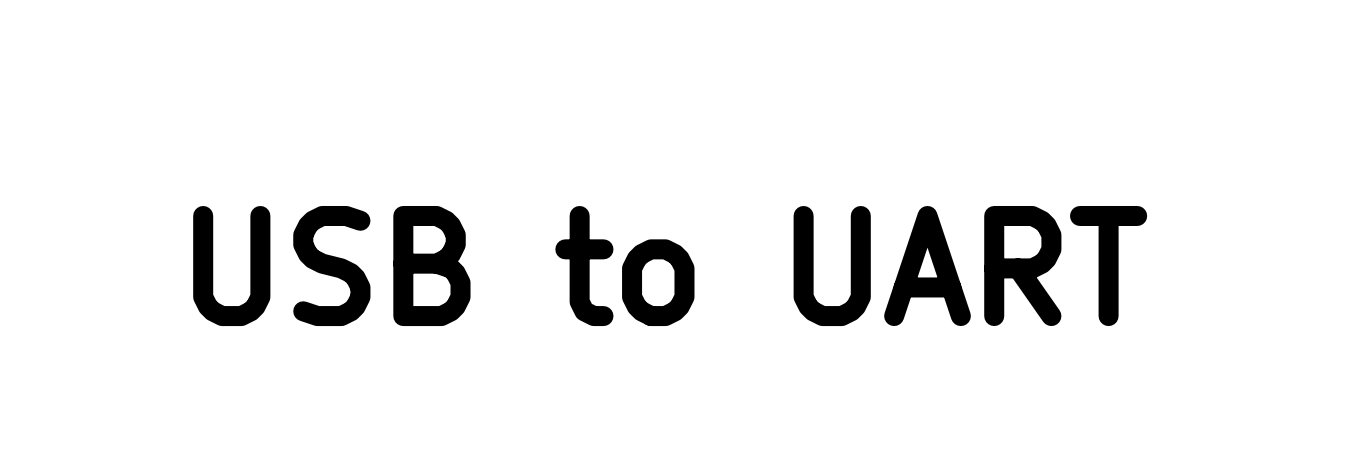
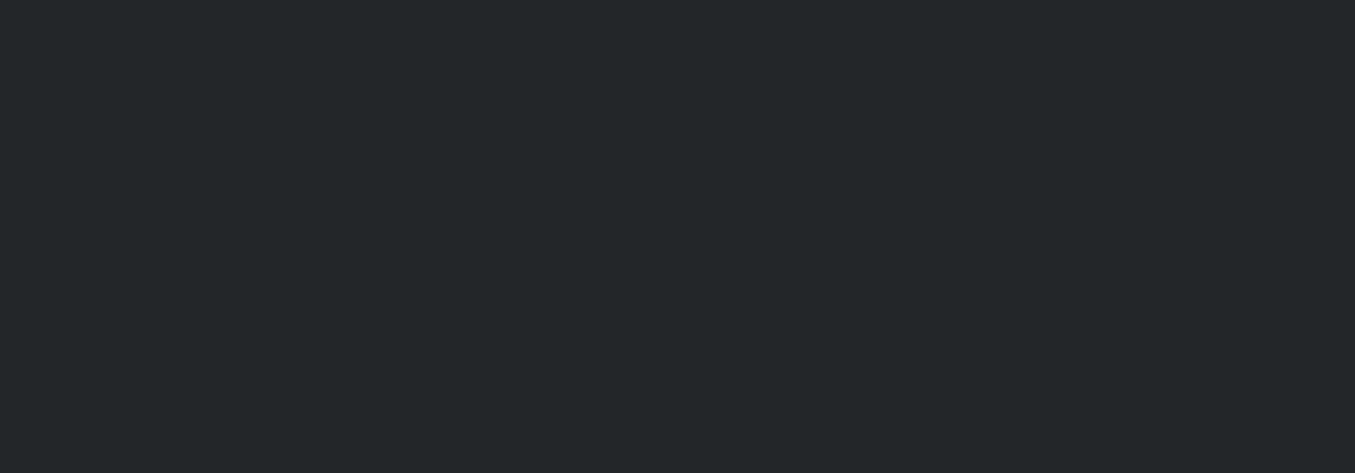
text: USB to UART (670, 266) -> none

